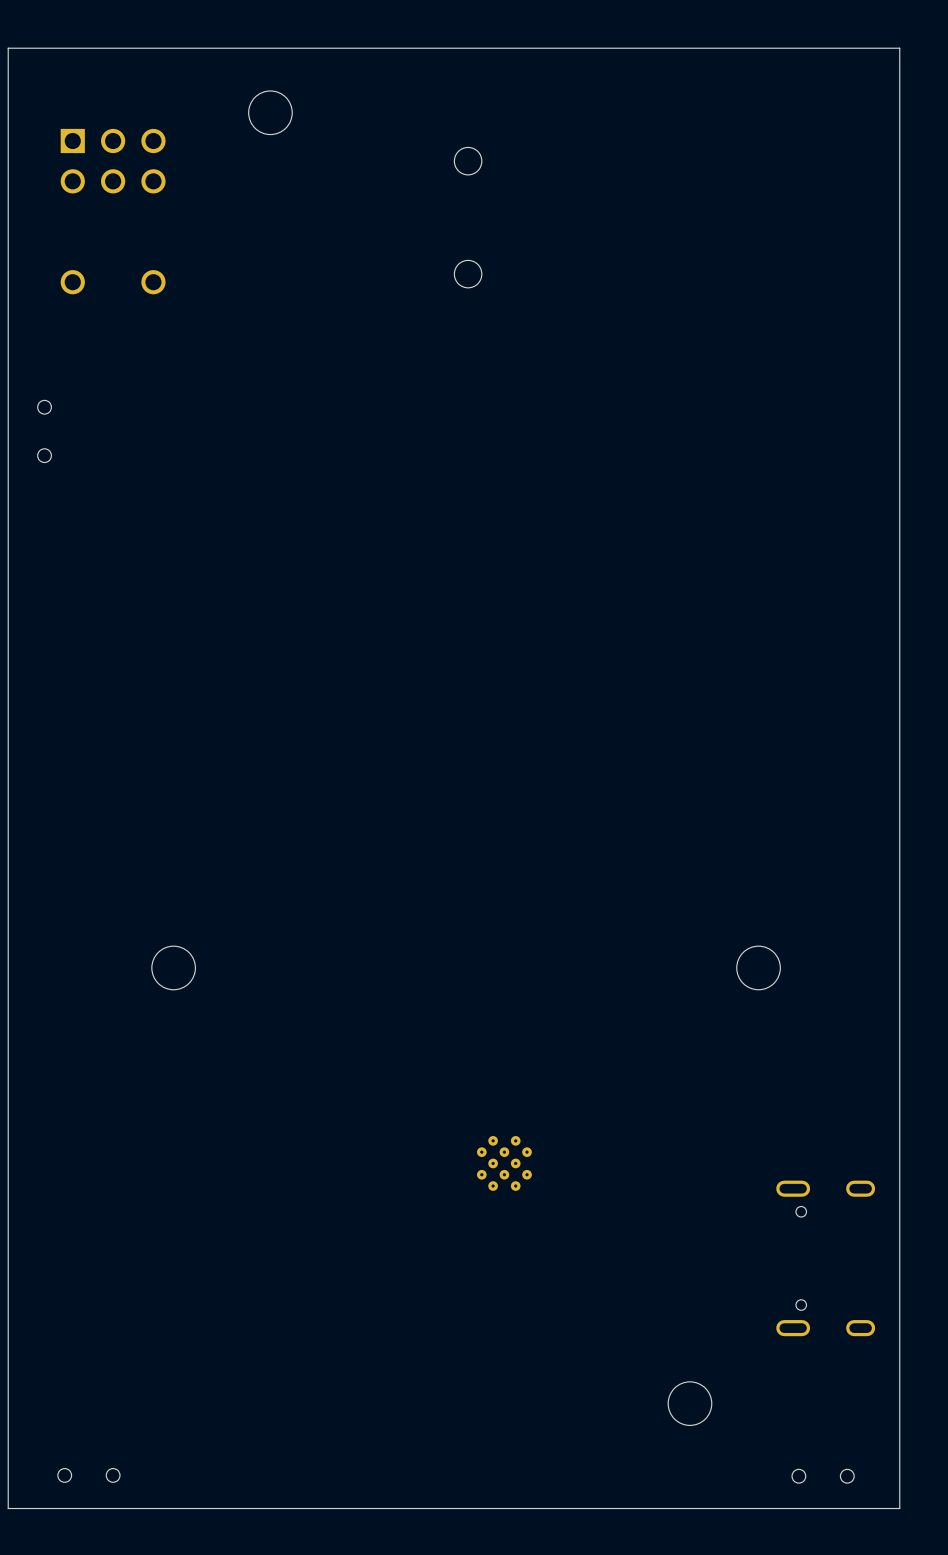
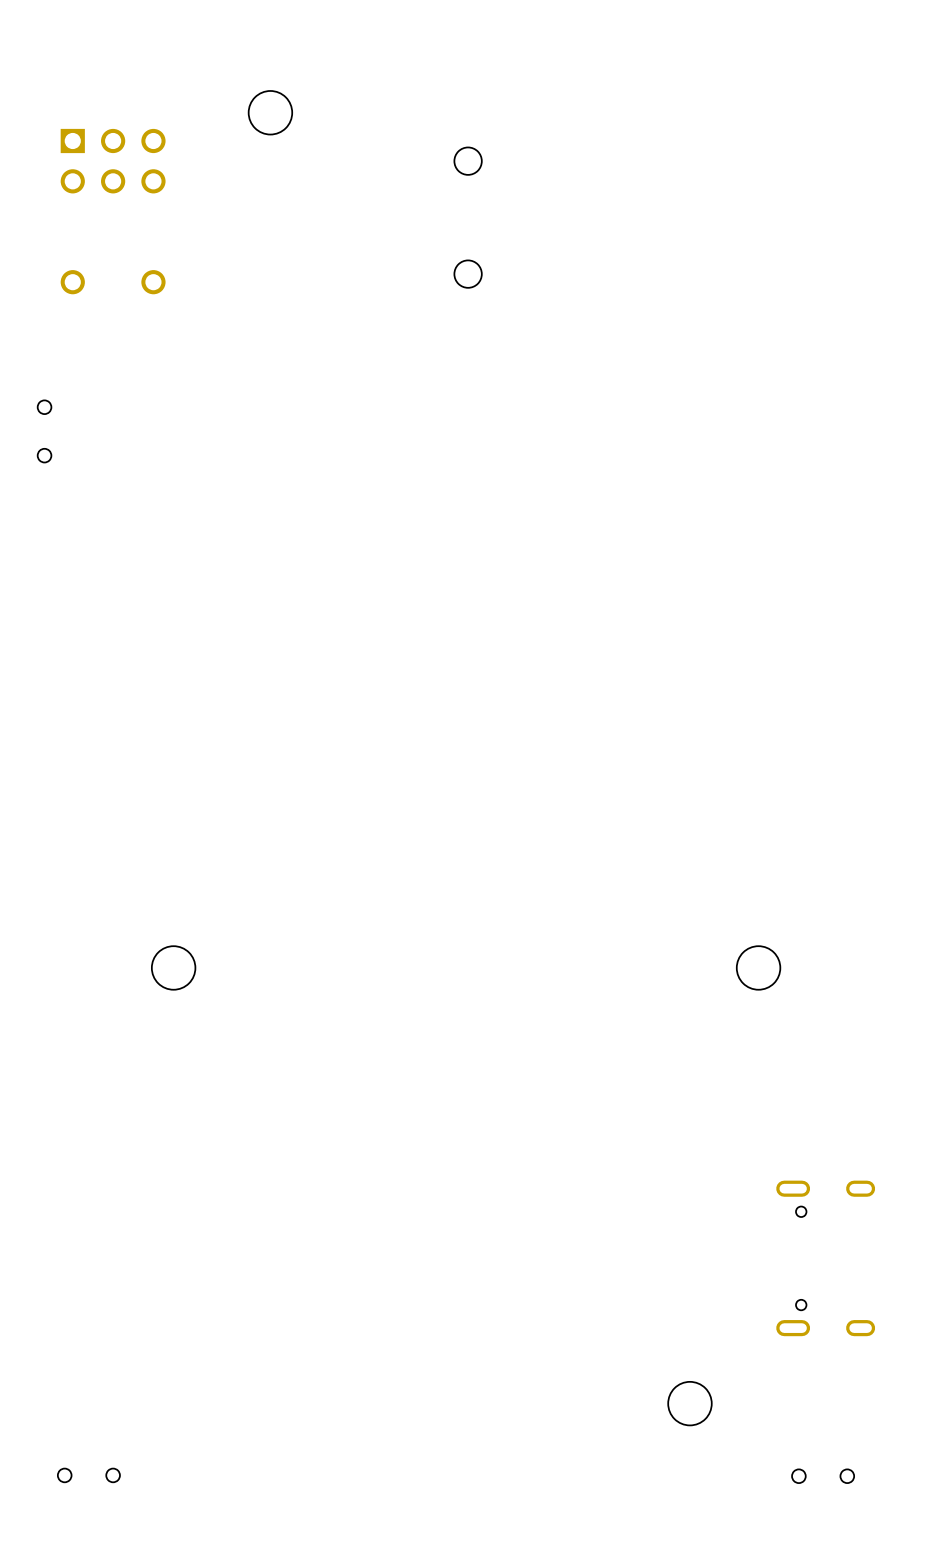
board edge: (899, 48) (8, 48) (8, 1508) (899, 1508) (899, 48) -> none
part: (504, 1163) -> none

